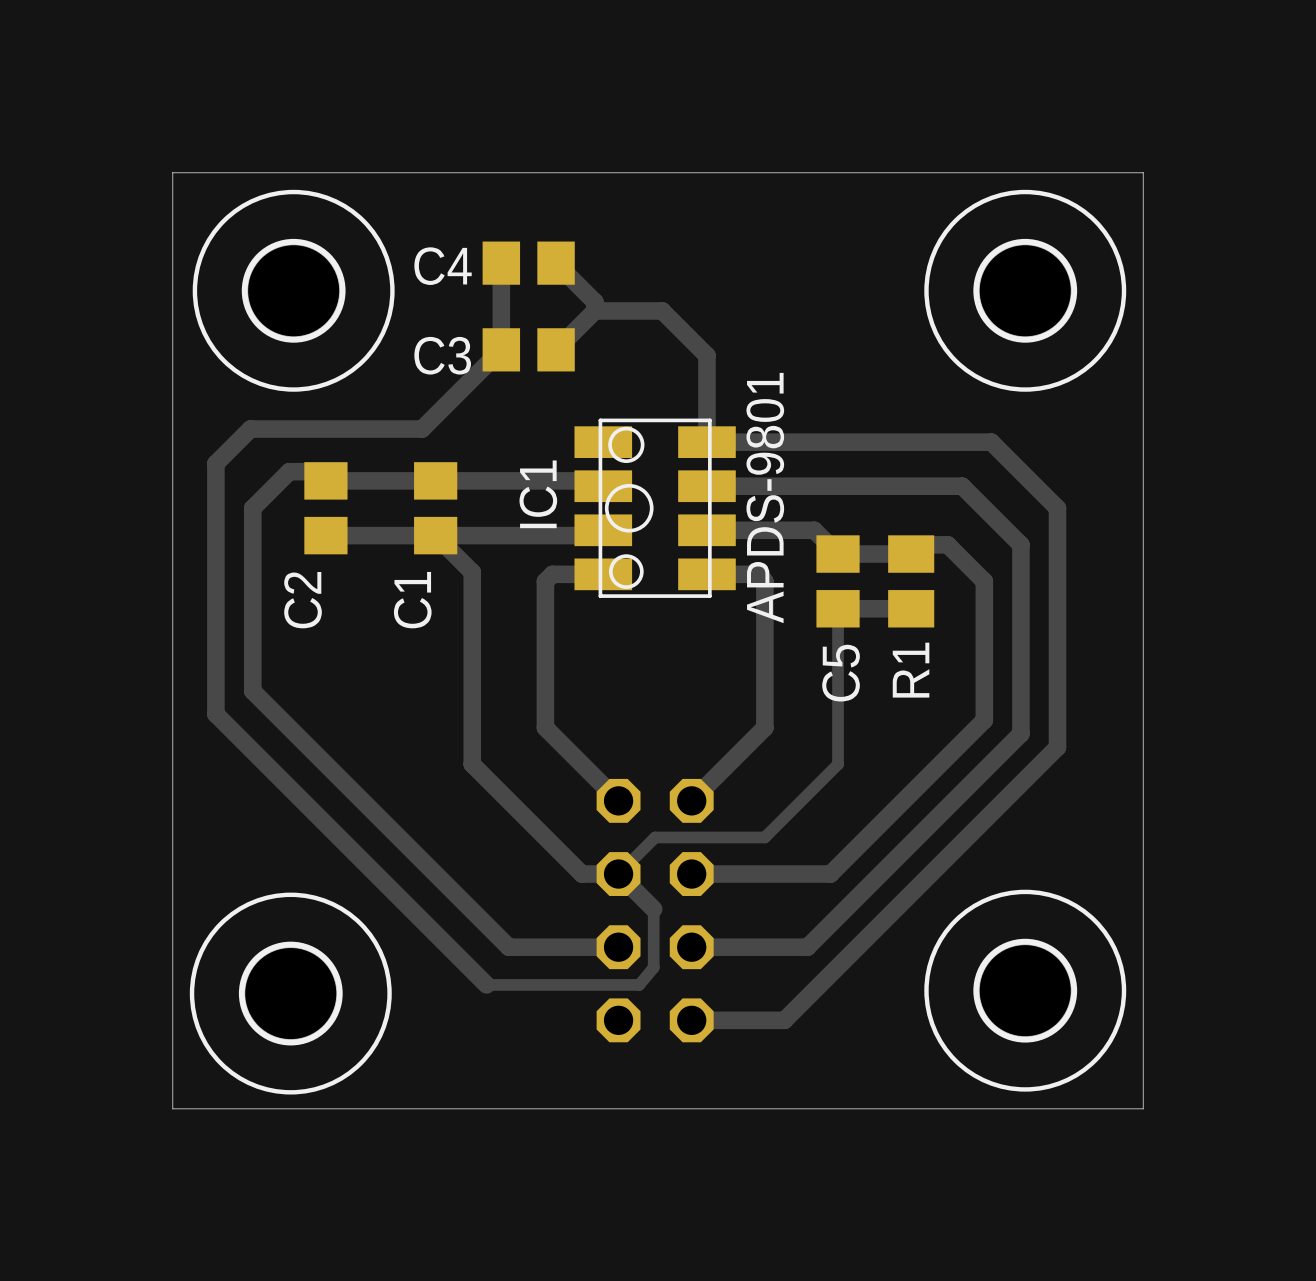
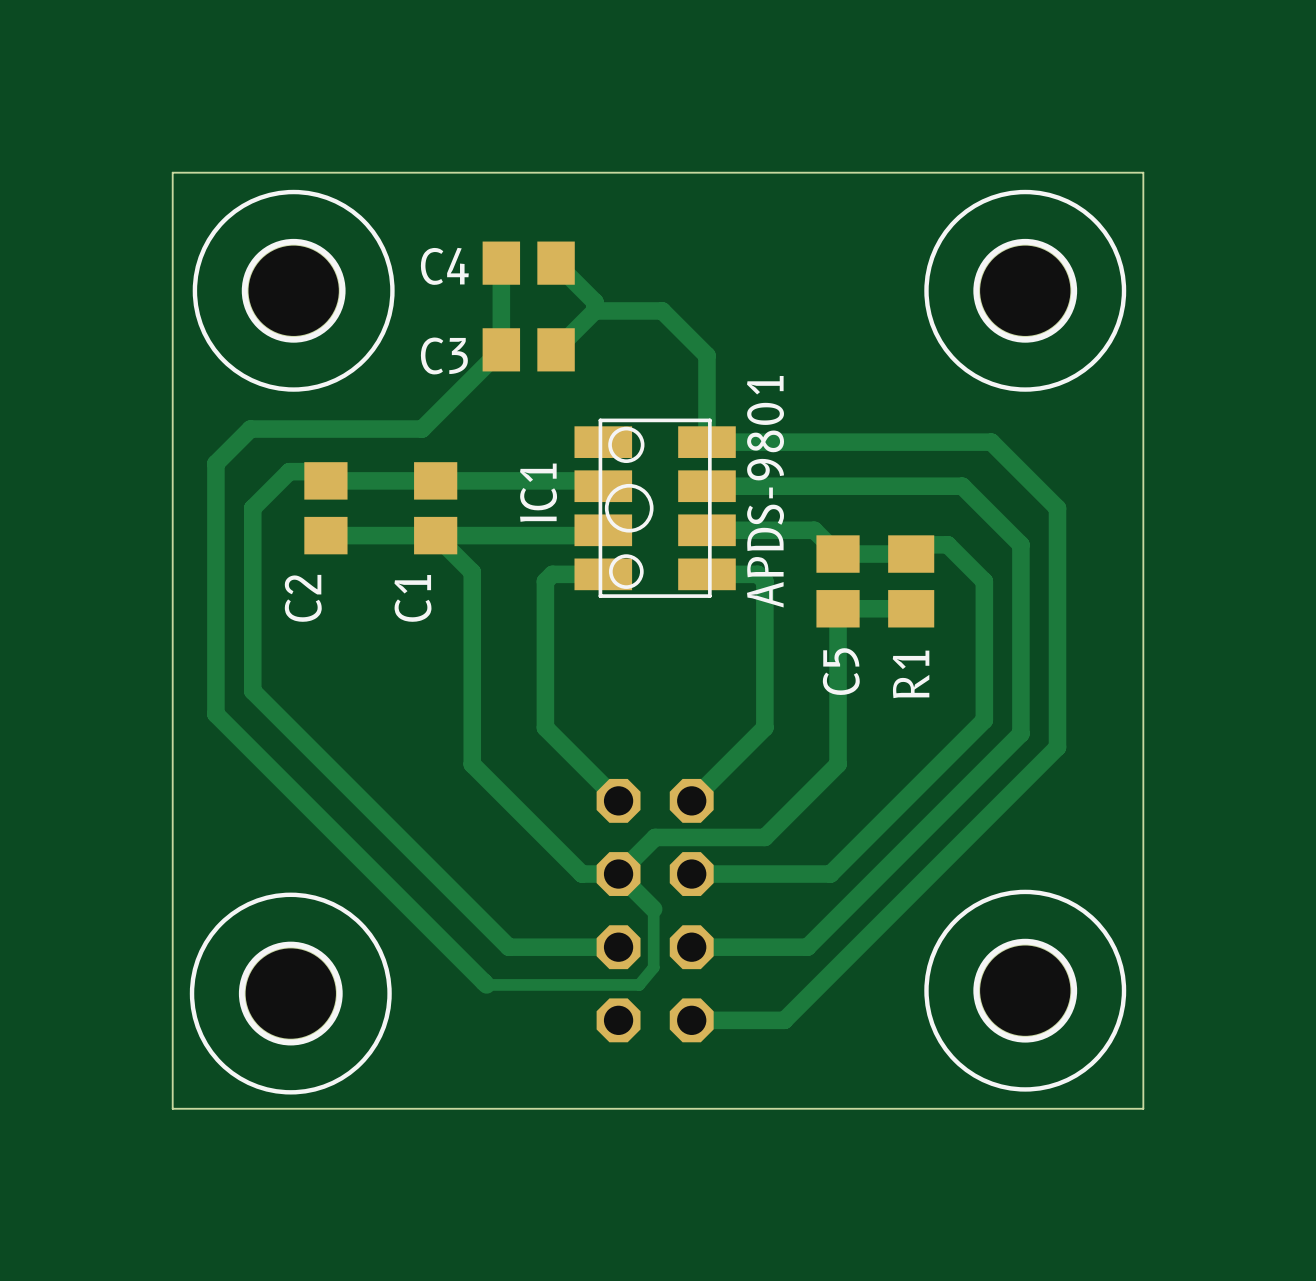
track width: thin (838, 608) (838, 764) (764, 837) (655, 837) (618, 874) -> thick (838, 608) (838, 764) (764, 837) (655, 837) (618, 874)

